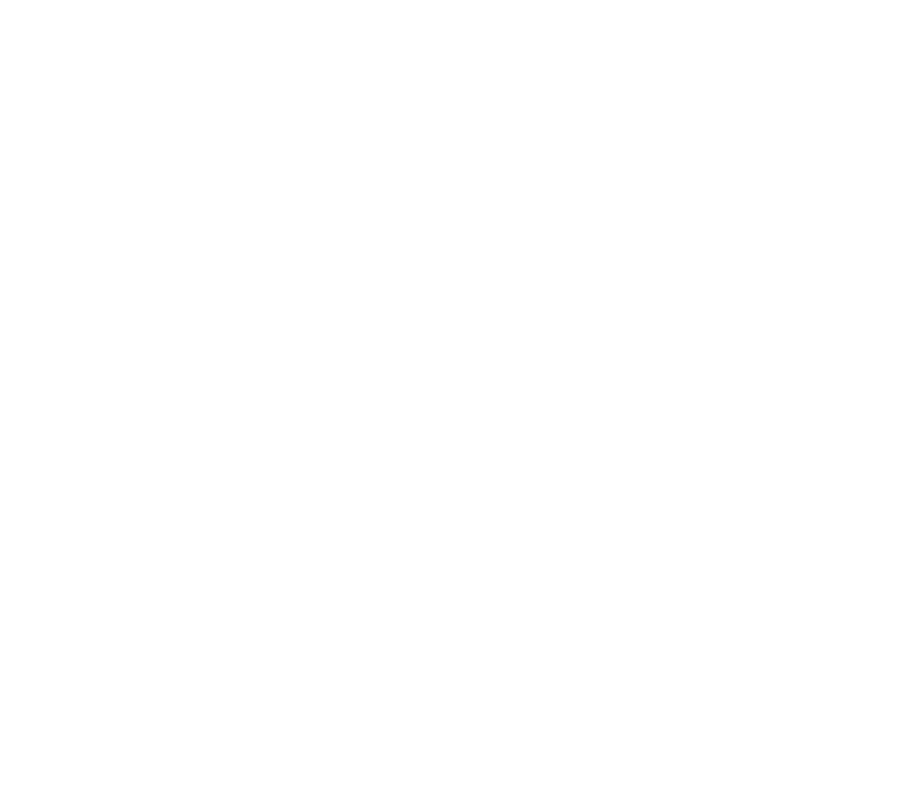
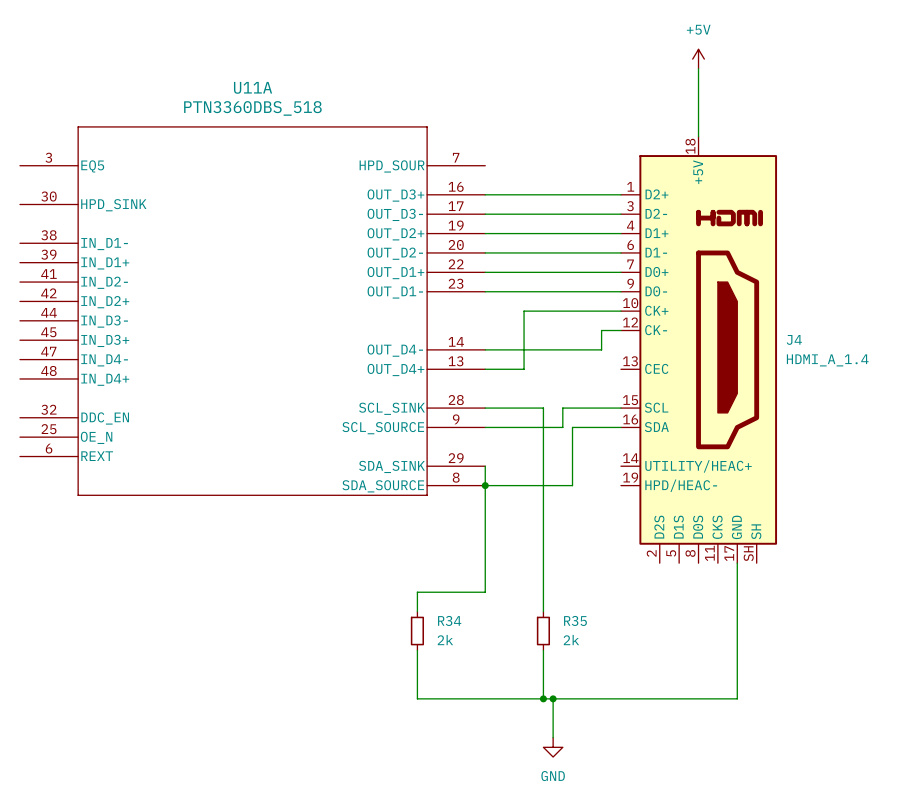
power symbol: none -> +5V (698, 59)
wire: none -> (698, 68) (698, 136)
wire: none -> (485, 194) (620, 194)
wire: none -> (485, 214) (620, 214)
wire: none -> (485, 233) (620, 233)
wire: none -> (485, 252) (620, 252)
wire: none -> (485, 272) (620, 272)
wire: none -> (485, 291) (620, 291)
U11A: none -> PTN3360DBS_518 (252, 311)
wire: none -> (620, 311) (524, 311) (524, 369) (485, 369)
wire: none -> (620, 330) (601, 330) (601, 349) (485, 349)
J4: none -> HDMI_A_1.4 (699, 349)
wire: none -> (485, 408) (543, 408) (543, 611)
wire: none -> (620, 408) (562, 408) (562, 427) (485, 427)
wire: none -> (620, 427) (572, 427) (572, 485) (485, 485)
wire: none -> (485, 466) (485, 592) (417, 592) (417, 611)
junction: none -> (485, 485)
wire: none -> (737, 563) (737, 698) (417, 698) (417, 650)
R34: none -> 2k (417, 631)
R35: none -> 2k (543, 631)
wire: none -> (543, 650) (543, 698)
junction: none -> (543, 698)
wire: none -> (553, 698) (553, 737)
junction: none -> (553, 698)
power symbol: none -> GND (553, 747)

